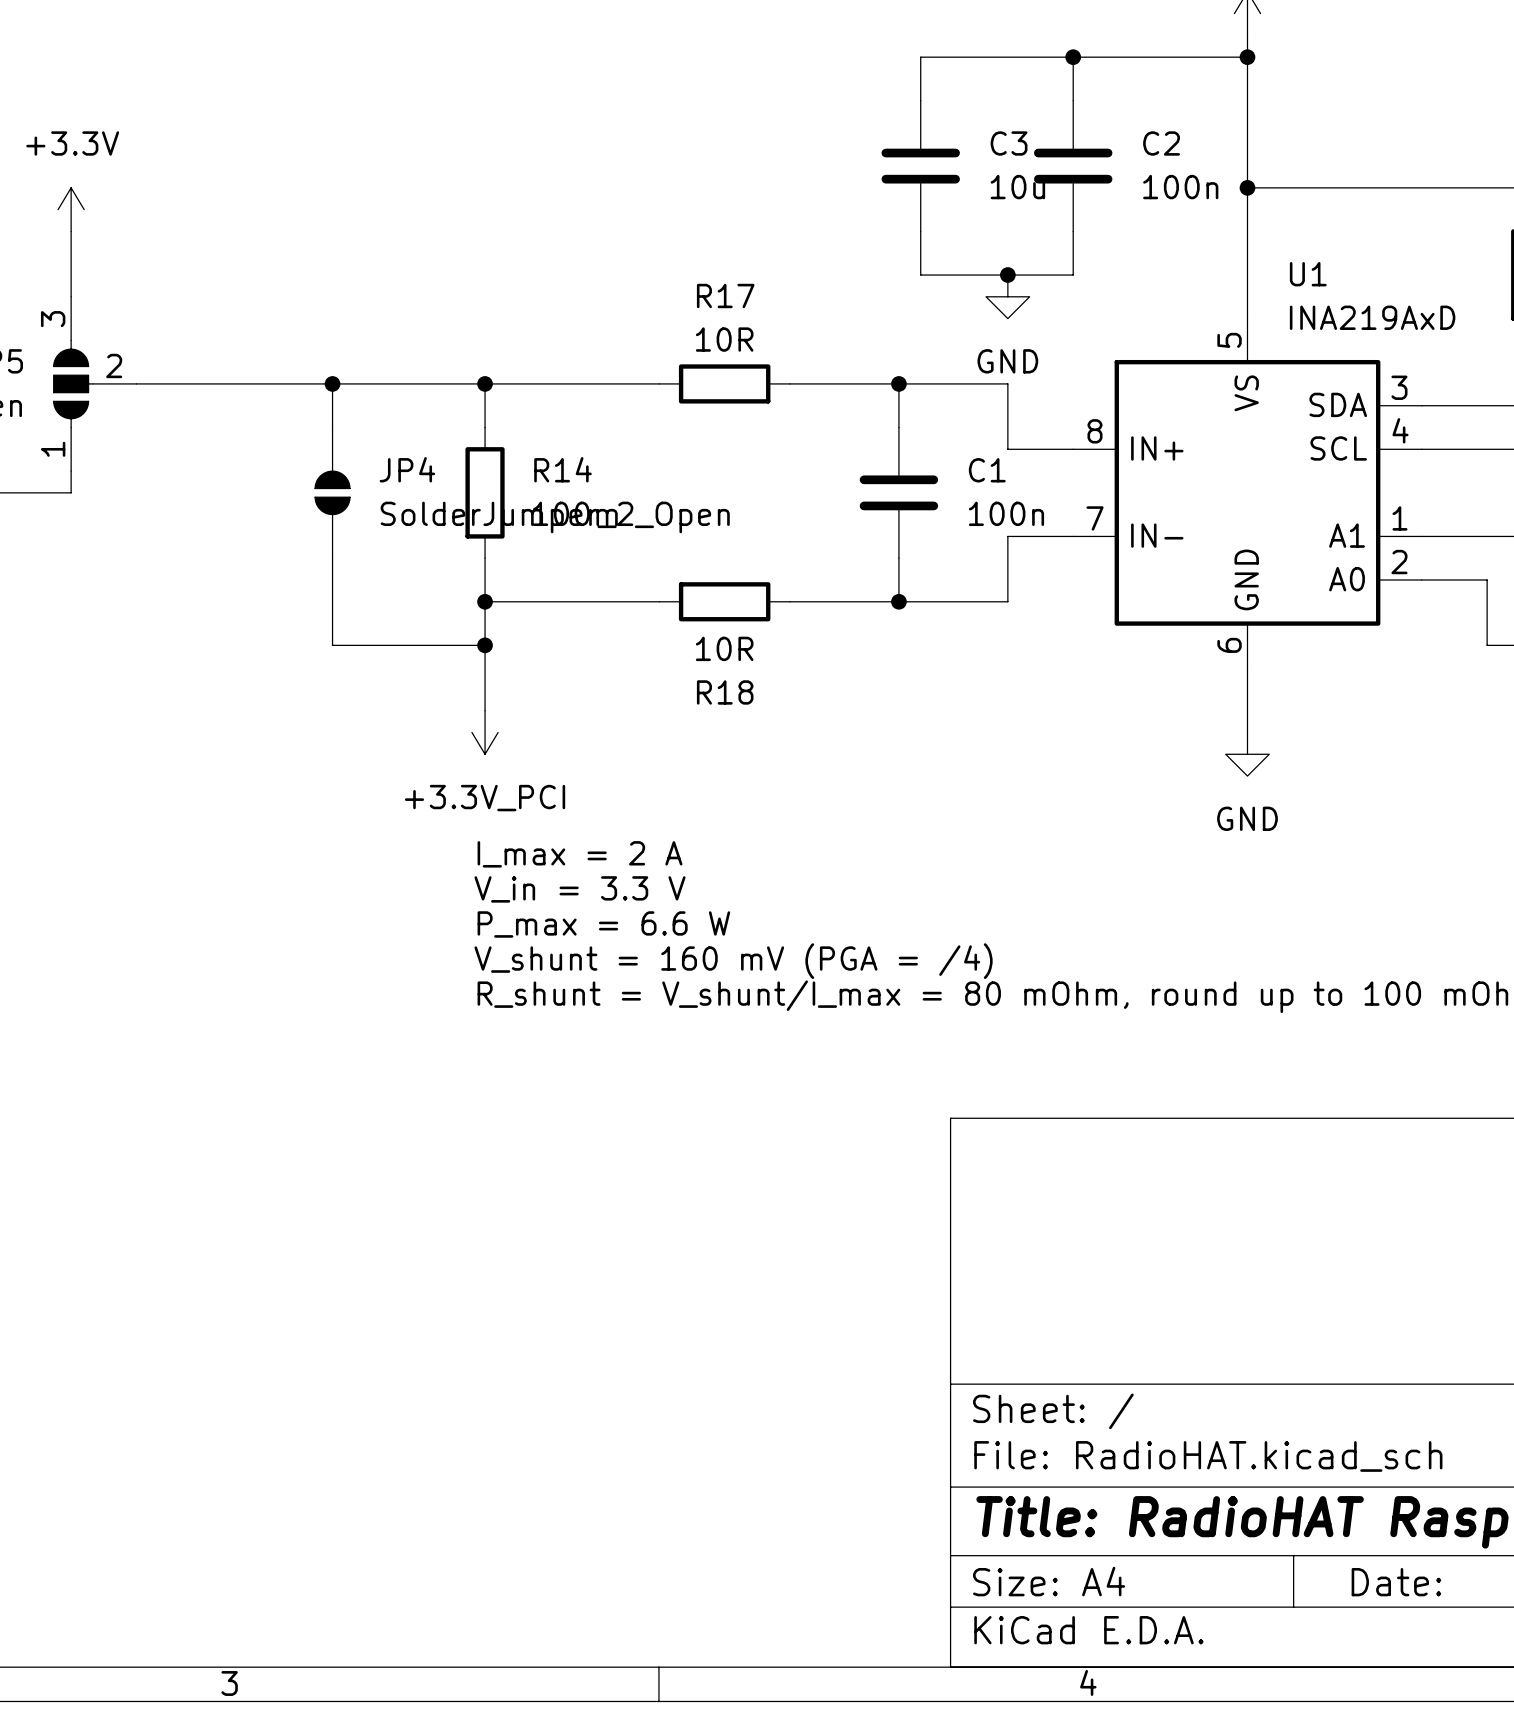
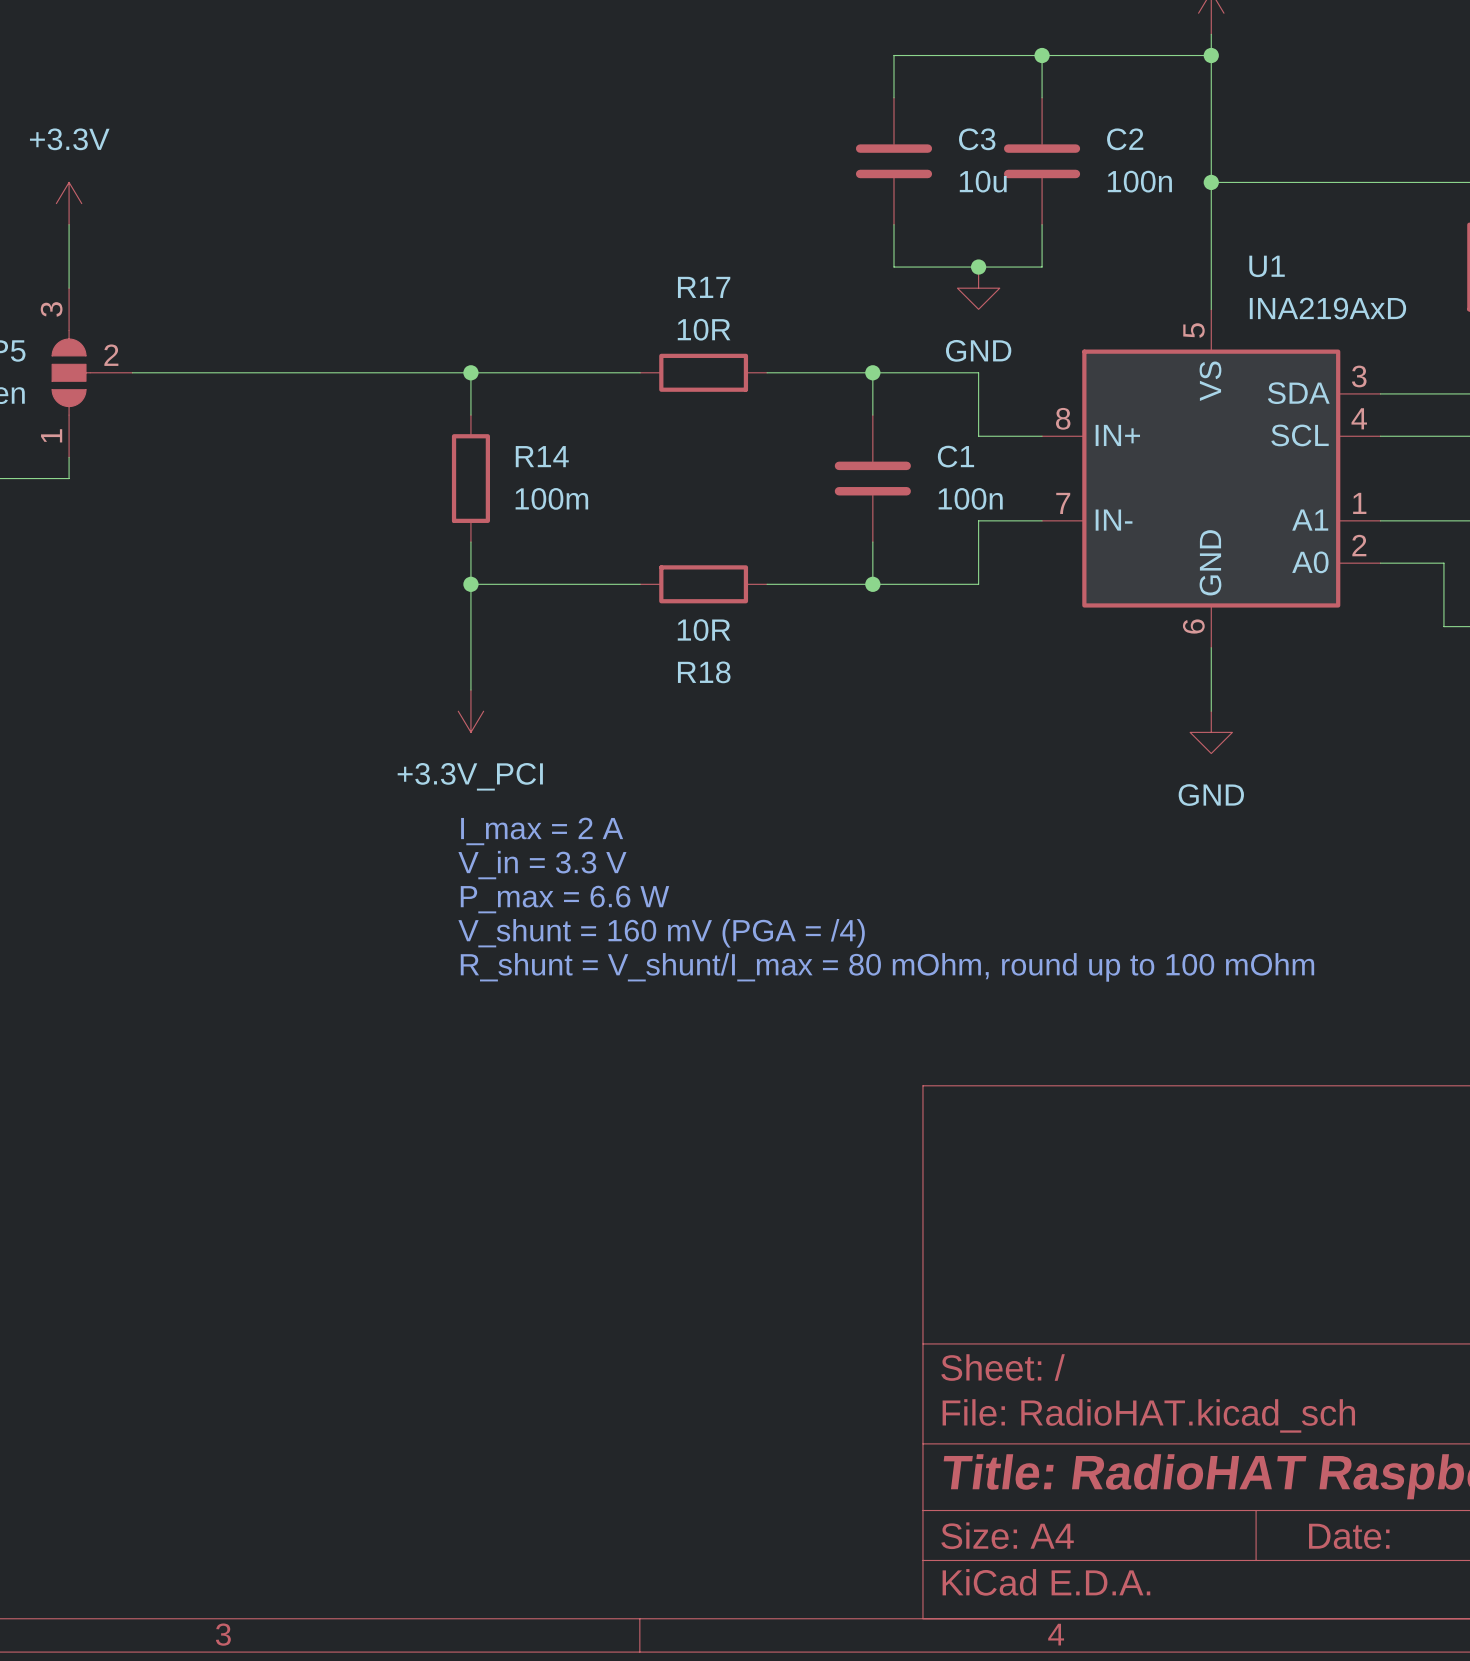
wire: (332, 383) (332, 427) -> none
junction: (332, 383) -> none
JP4: SolderJumper_2_Open (332, 492) -> none
wire: (332, 558) (332, 645) (485, 645) -> none
junction: (485, 645) -> none

